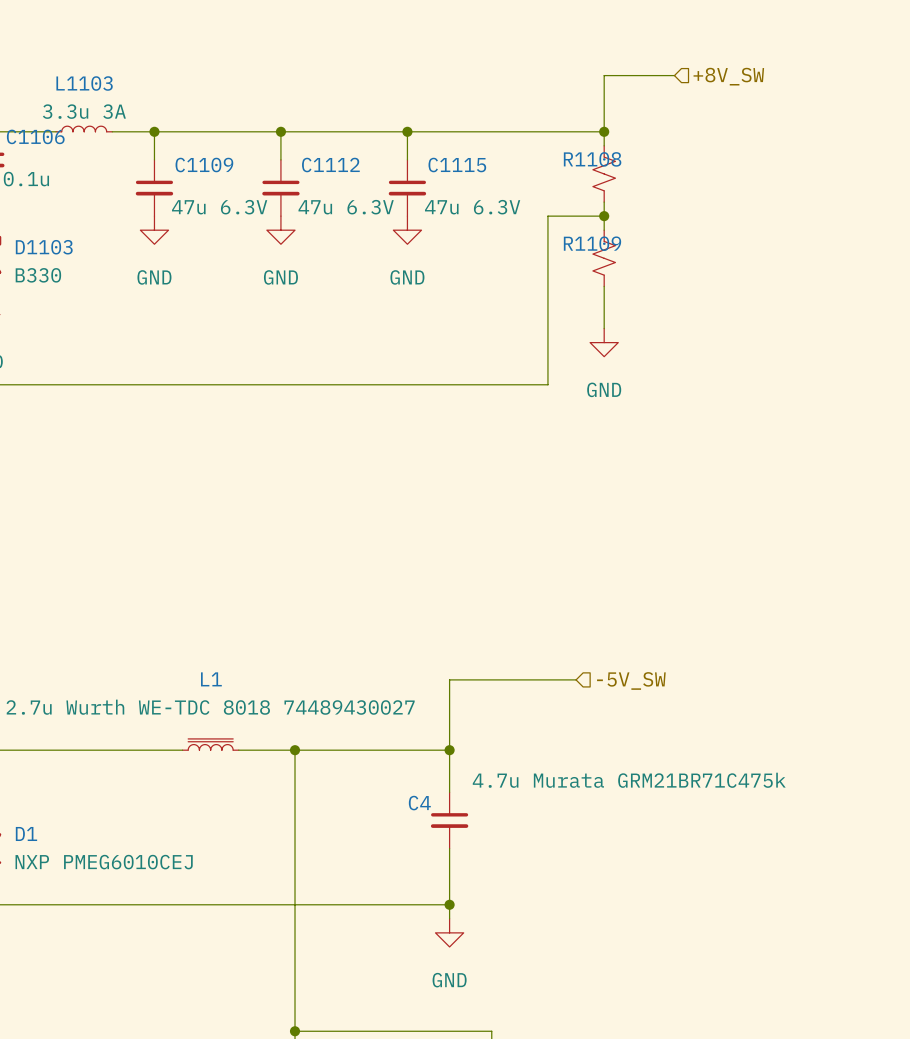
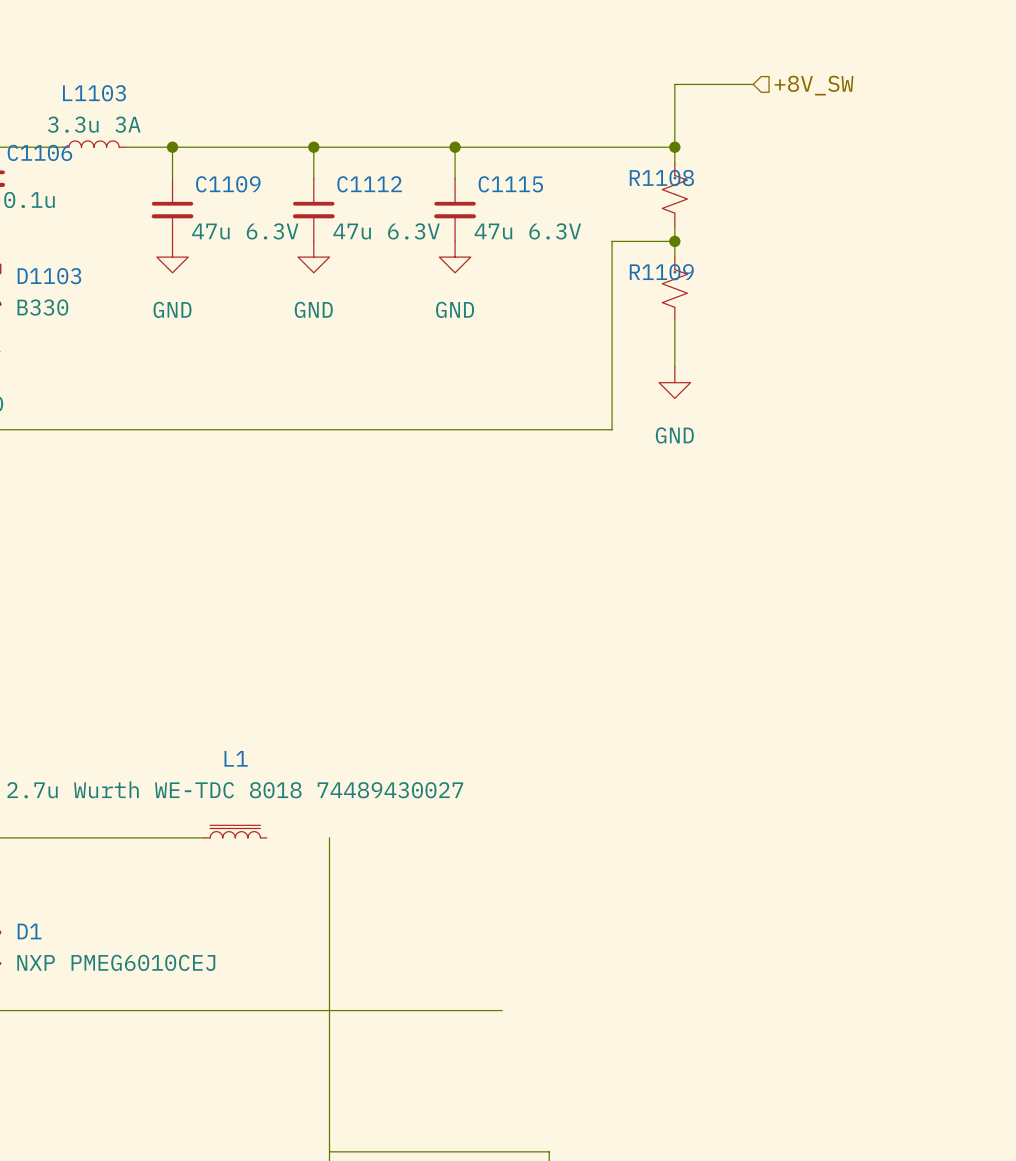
wire: (576, 679) (449, 679) (449, 792) -> none
hierarchical label: -5V_SW (631, 680) -> none
wire: (238, 750) (449, 750) -> none
junction: (295, 750) -> none
junction: (449, 750) -> none
C4: 4.7u Murata GRM21BR71C475k (449, 820) -> none
wire: (449, 848) (449, 918) -> none
junction: (449, 904) -> none
power symbol: GND (449, 932) -> none
junction: (295, 1031) -> none

